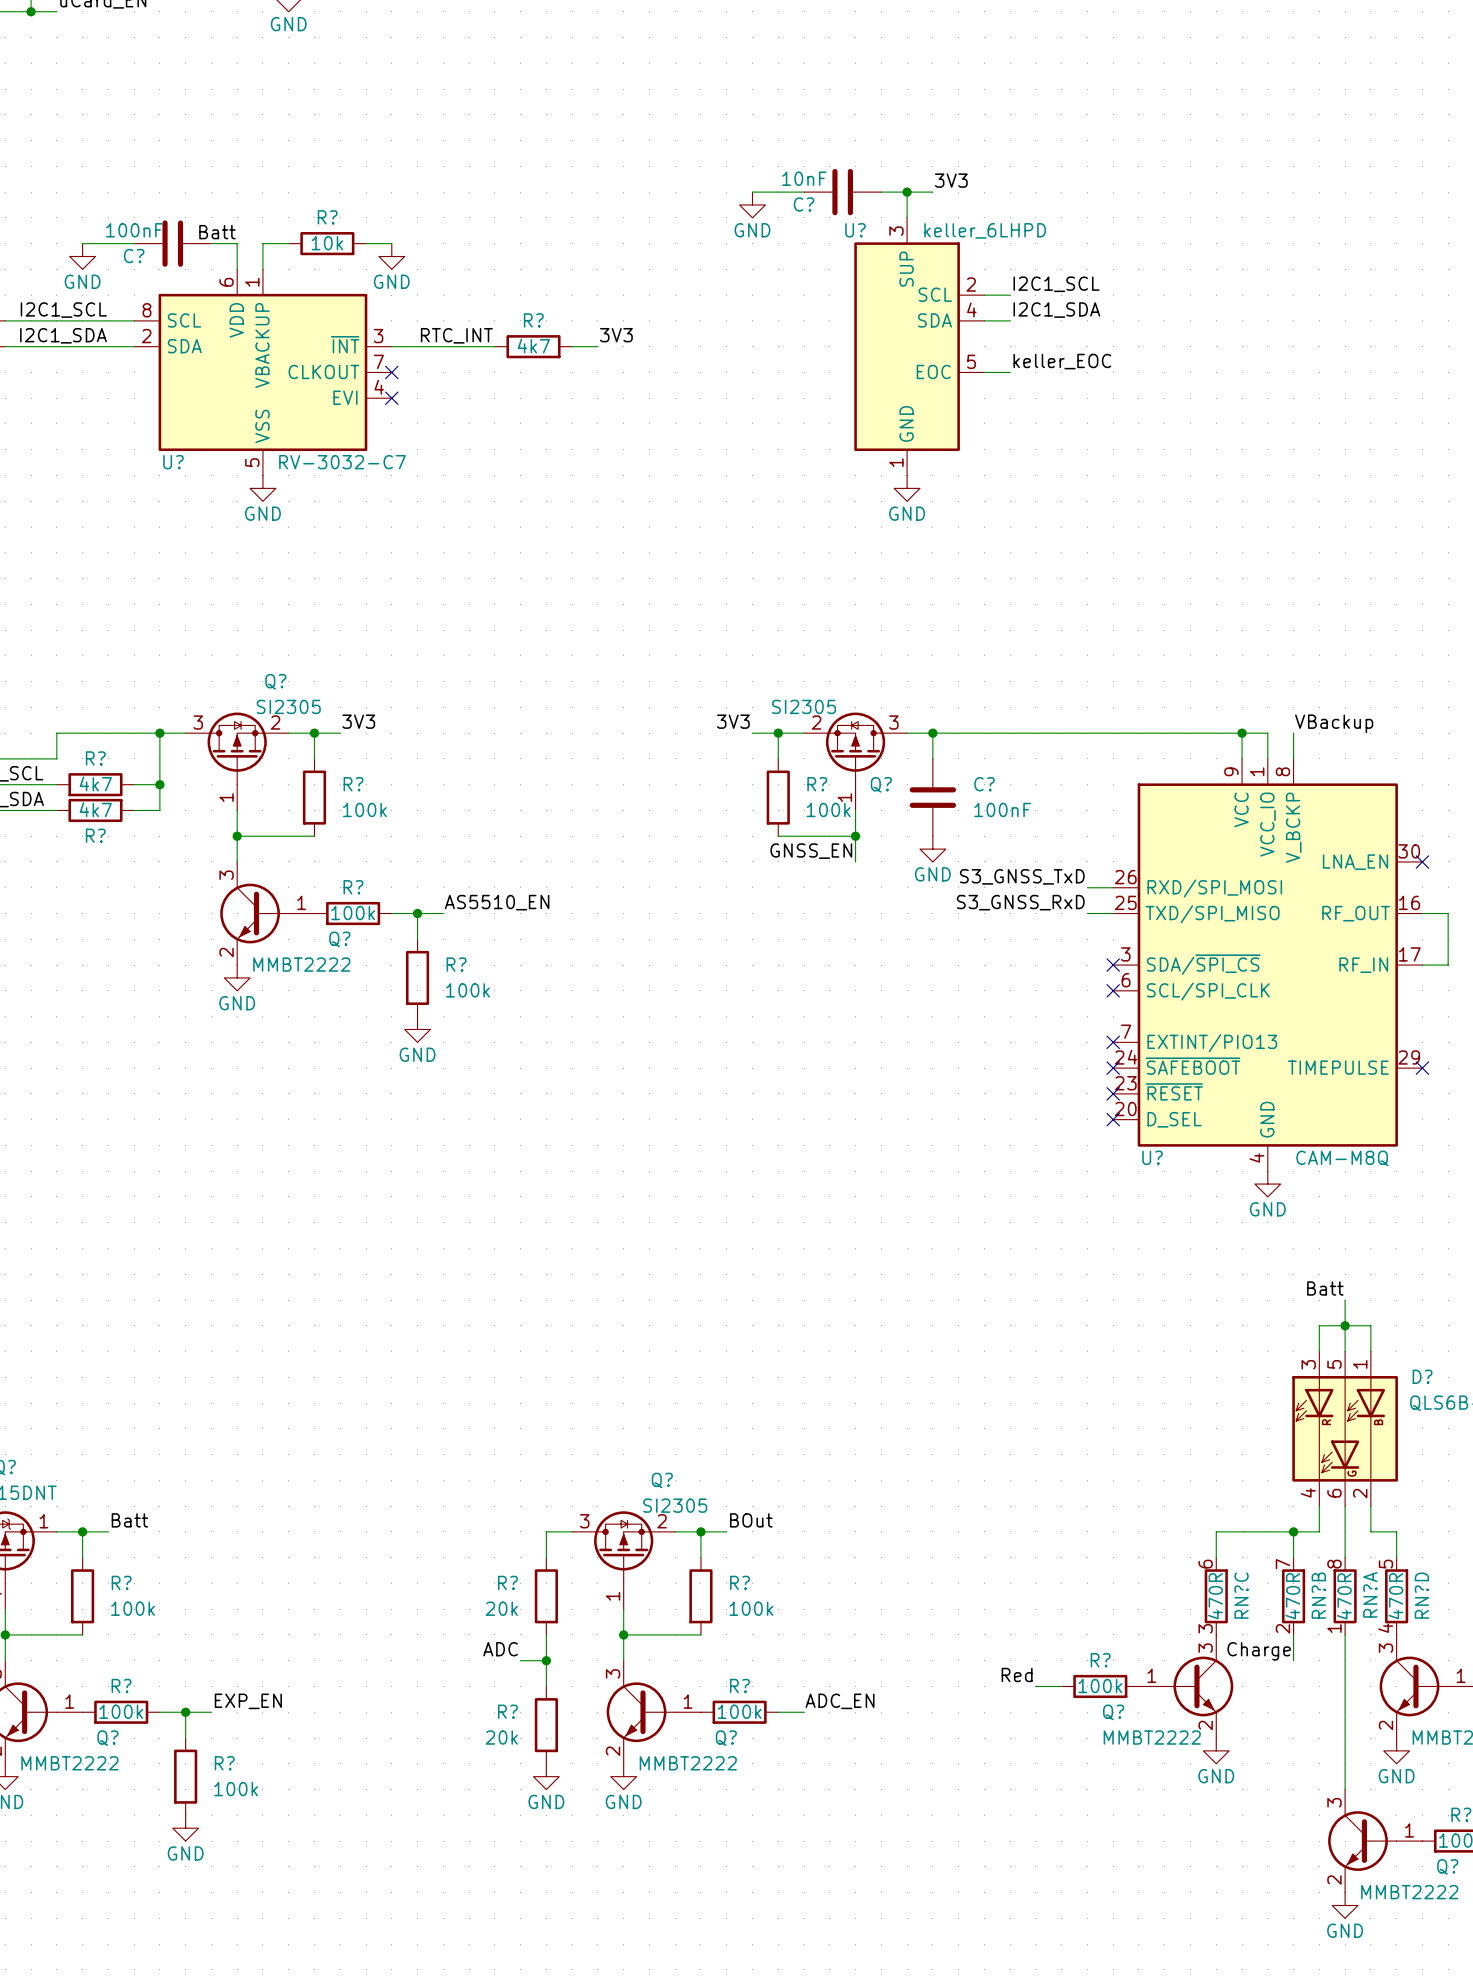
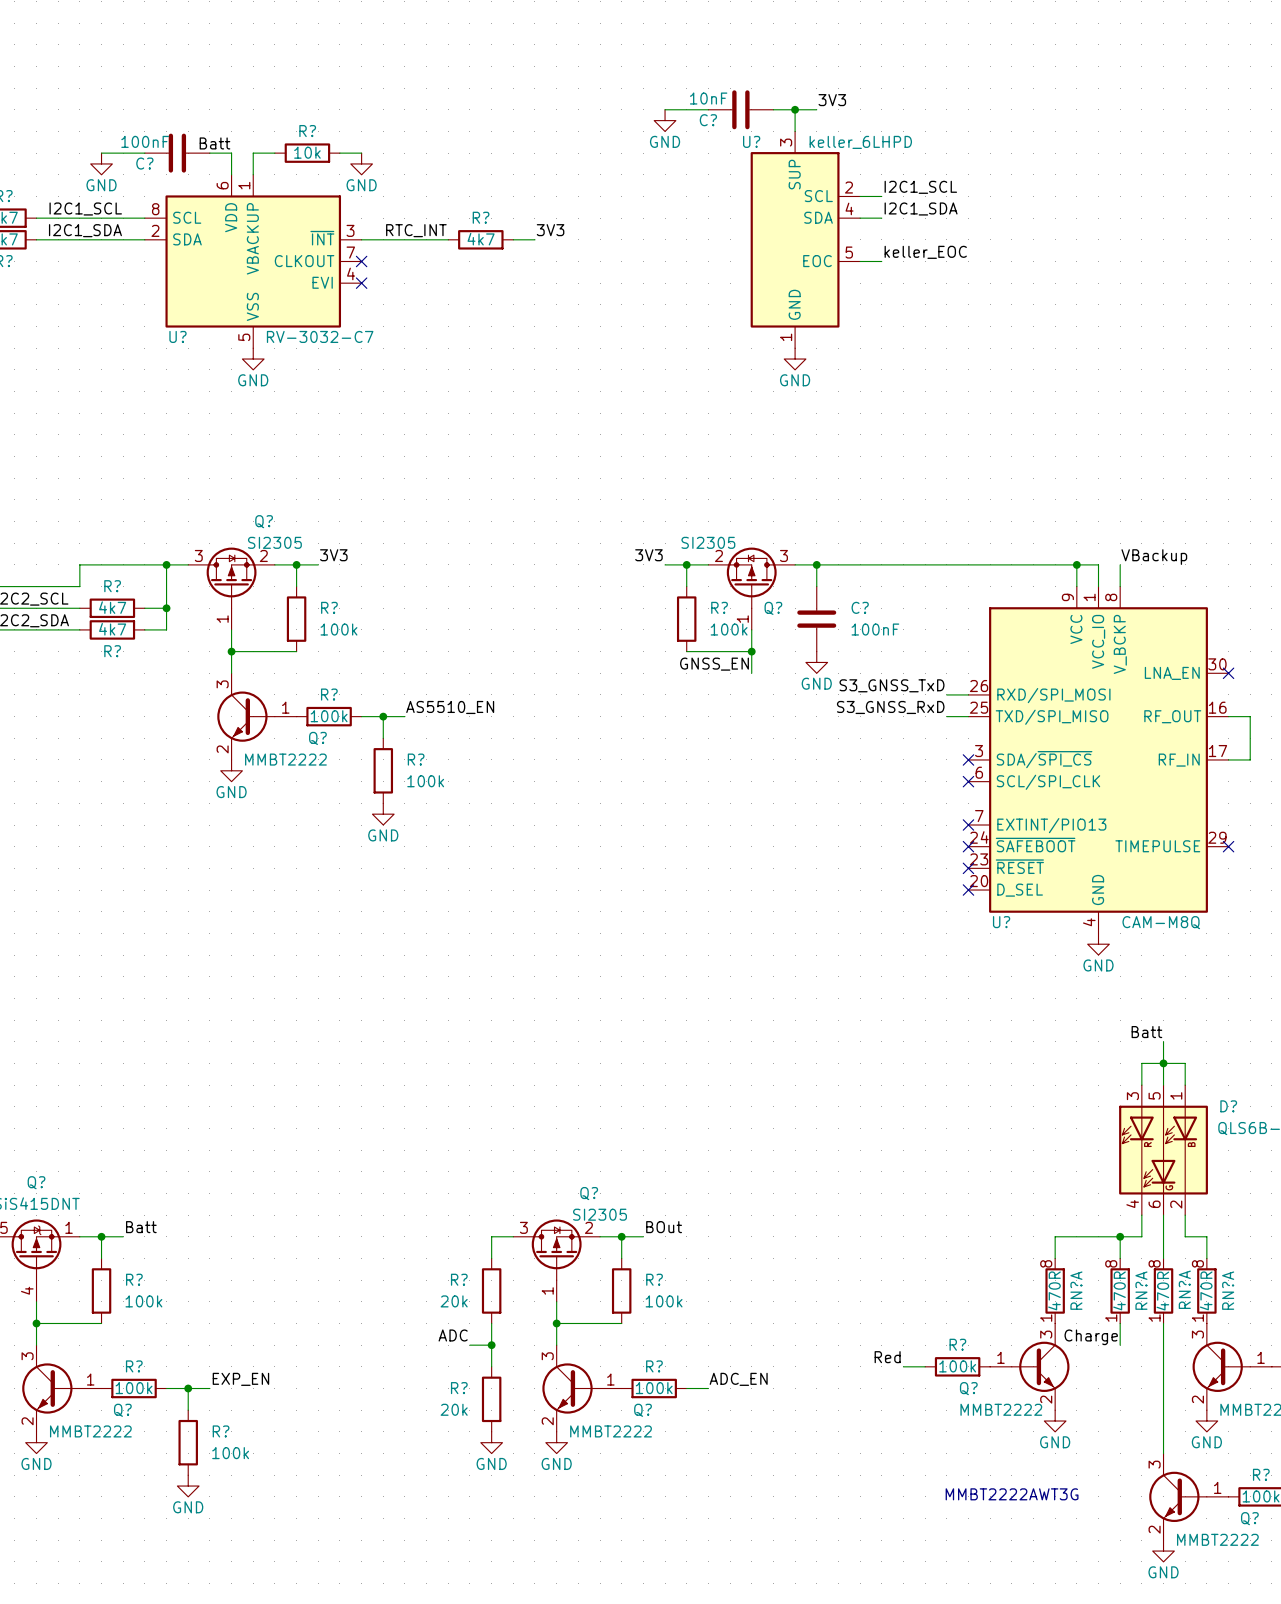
RN?C pin number: 6 (1205, 1564) -> 8 (1046, 1263)
RN?B pin number: 7 (1282, 1564) -> 8 (1111, 1263)
RN?D pin number: 5 (1386, 1564) -> 8 (1197, 1263)
RN?C name: RN?C (1241, 1595) -> RN?A (1076, 1290)
RN?B name: RN?B (1318, 1595) -> RN?A (1141, 1290)
RN?D name: RN?D (1421, 1595) -> RN?A (1228, 1290)
RN?C pin number: 3 (1205, 1628) -> 1 (1046, 1318)
RN?B pin number: 2 (1282, 1628) -> 1 (1111, 1318)
RN?D pin number: 4 (1385, 1628) -> 1 (1197, 1318)
text: none -> MMBT2222AWT3G (1012, 1494)

